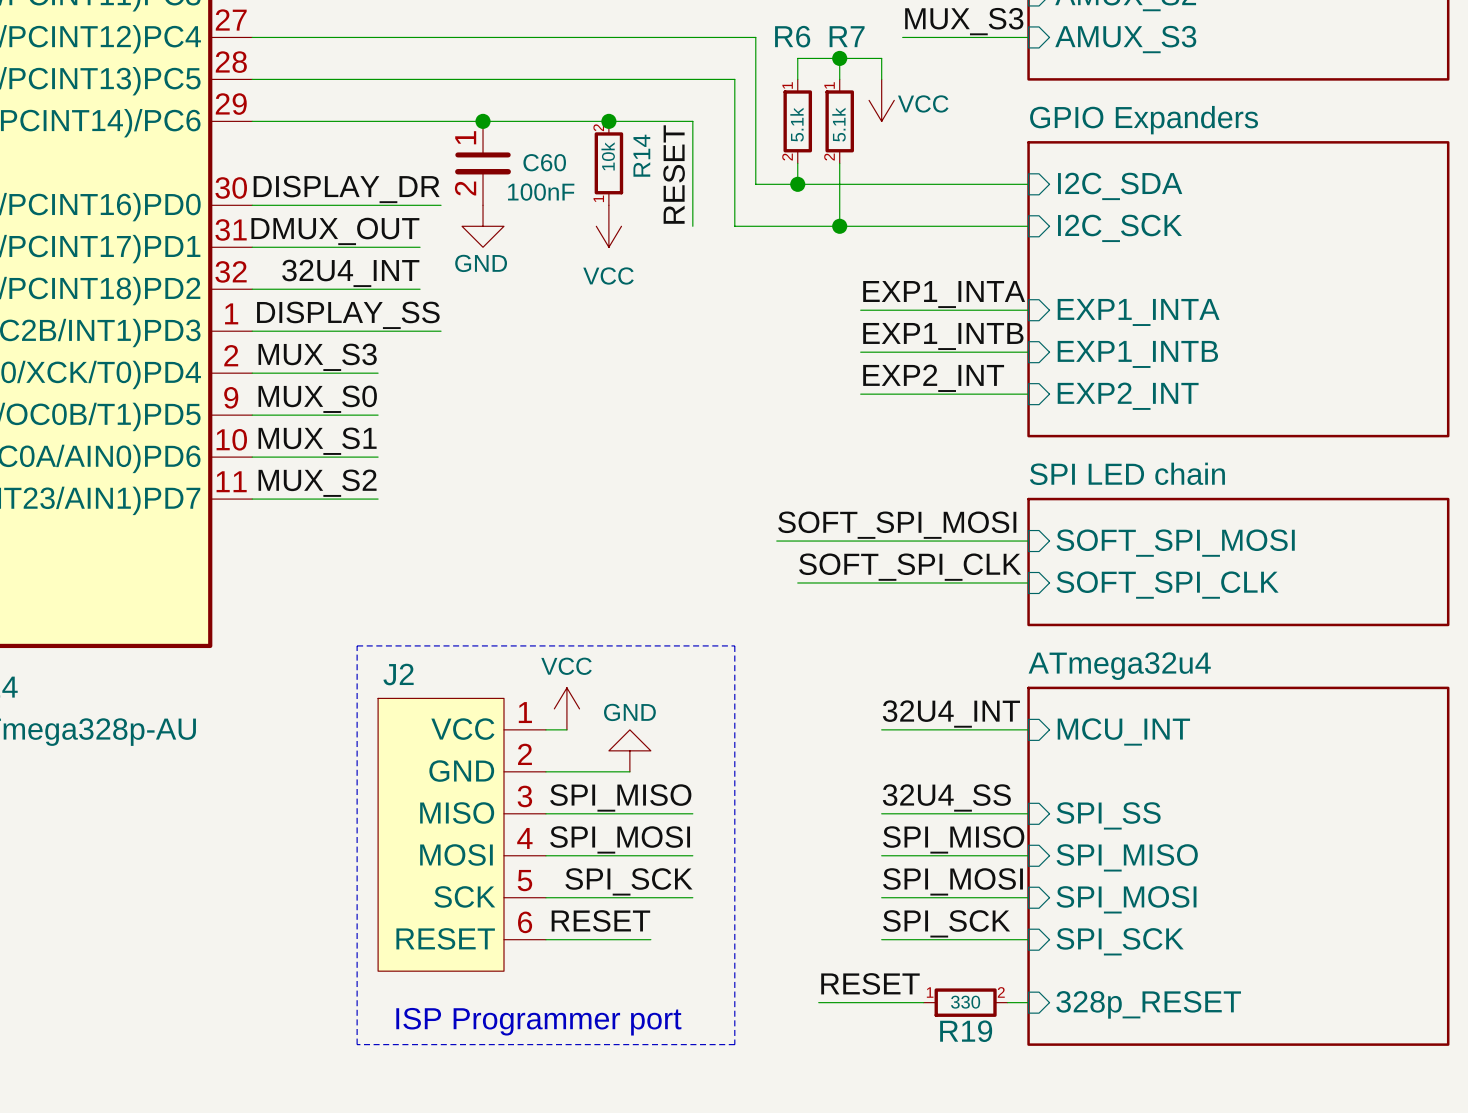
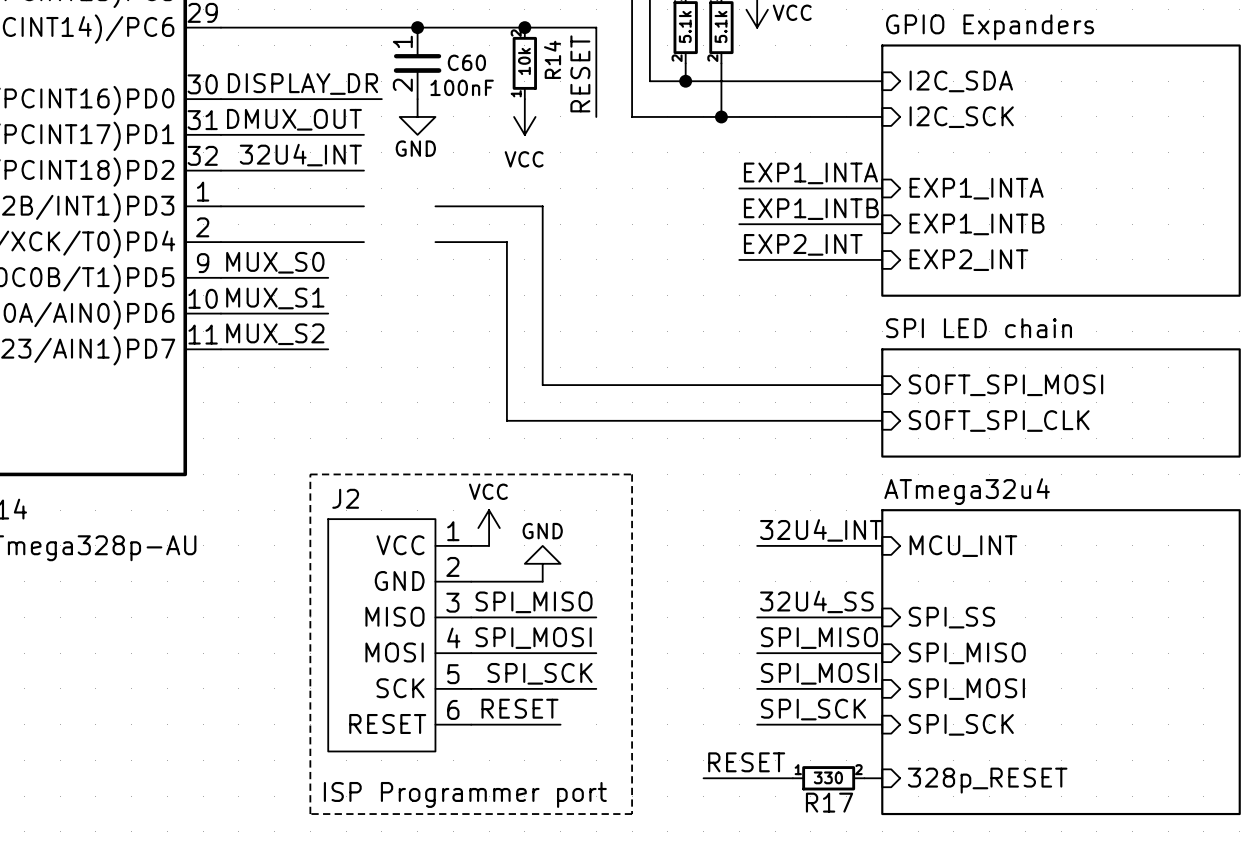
label: DISPLAY_SS (348, 315) -> none
wire: (420, 331) (441, 331) -> none
wire: none -> (435, 206) (542, 206) (542, 385) (667, 385)
label: MUX_S3 (317, 357) -> none
wire: none -> (328, 242) (363, 242)
wire: none -> (435, 242) (506, 242) (506, 420) (685, 420)
label: SOFT_SPI_MOSI (897, 525) -> none
label: SOFT_SPI_CLK (910, 567) -> none
R19 name: R19 (966, 1031) -> R17 (829, 802)

